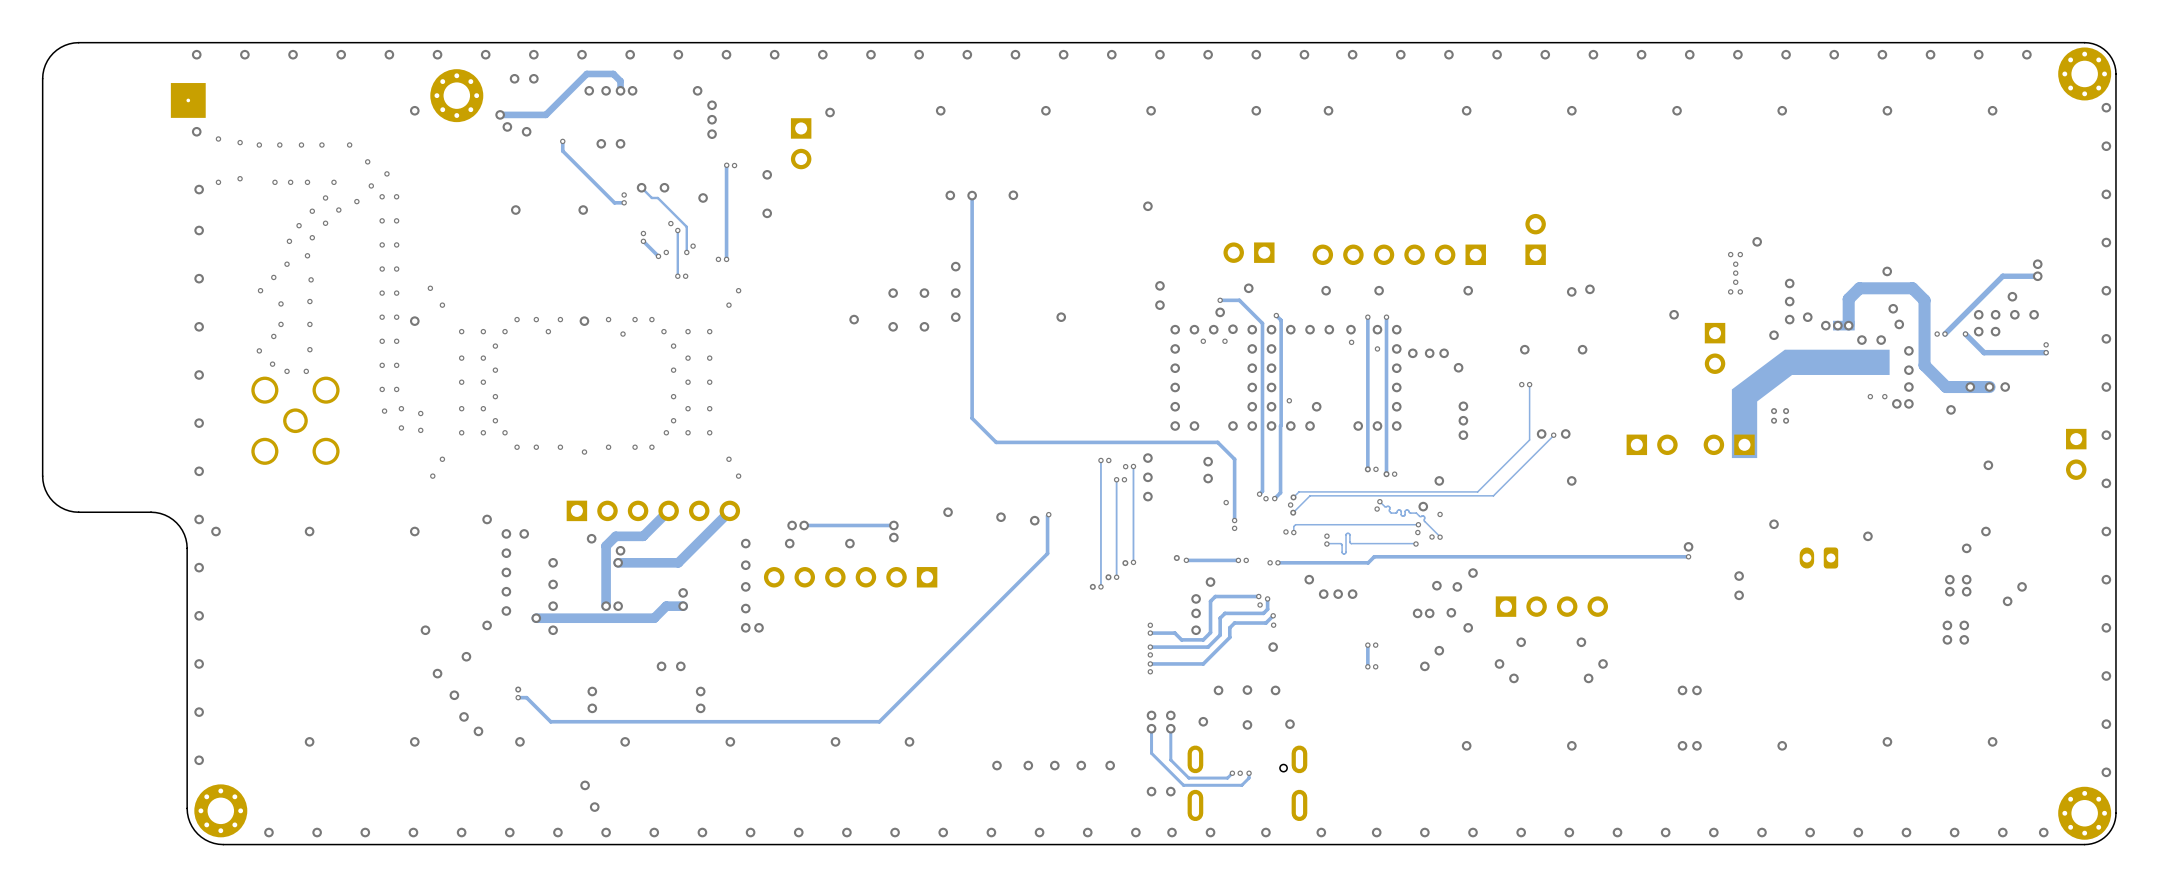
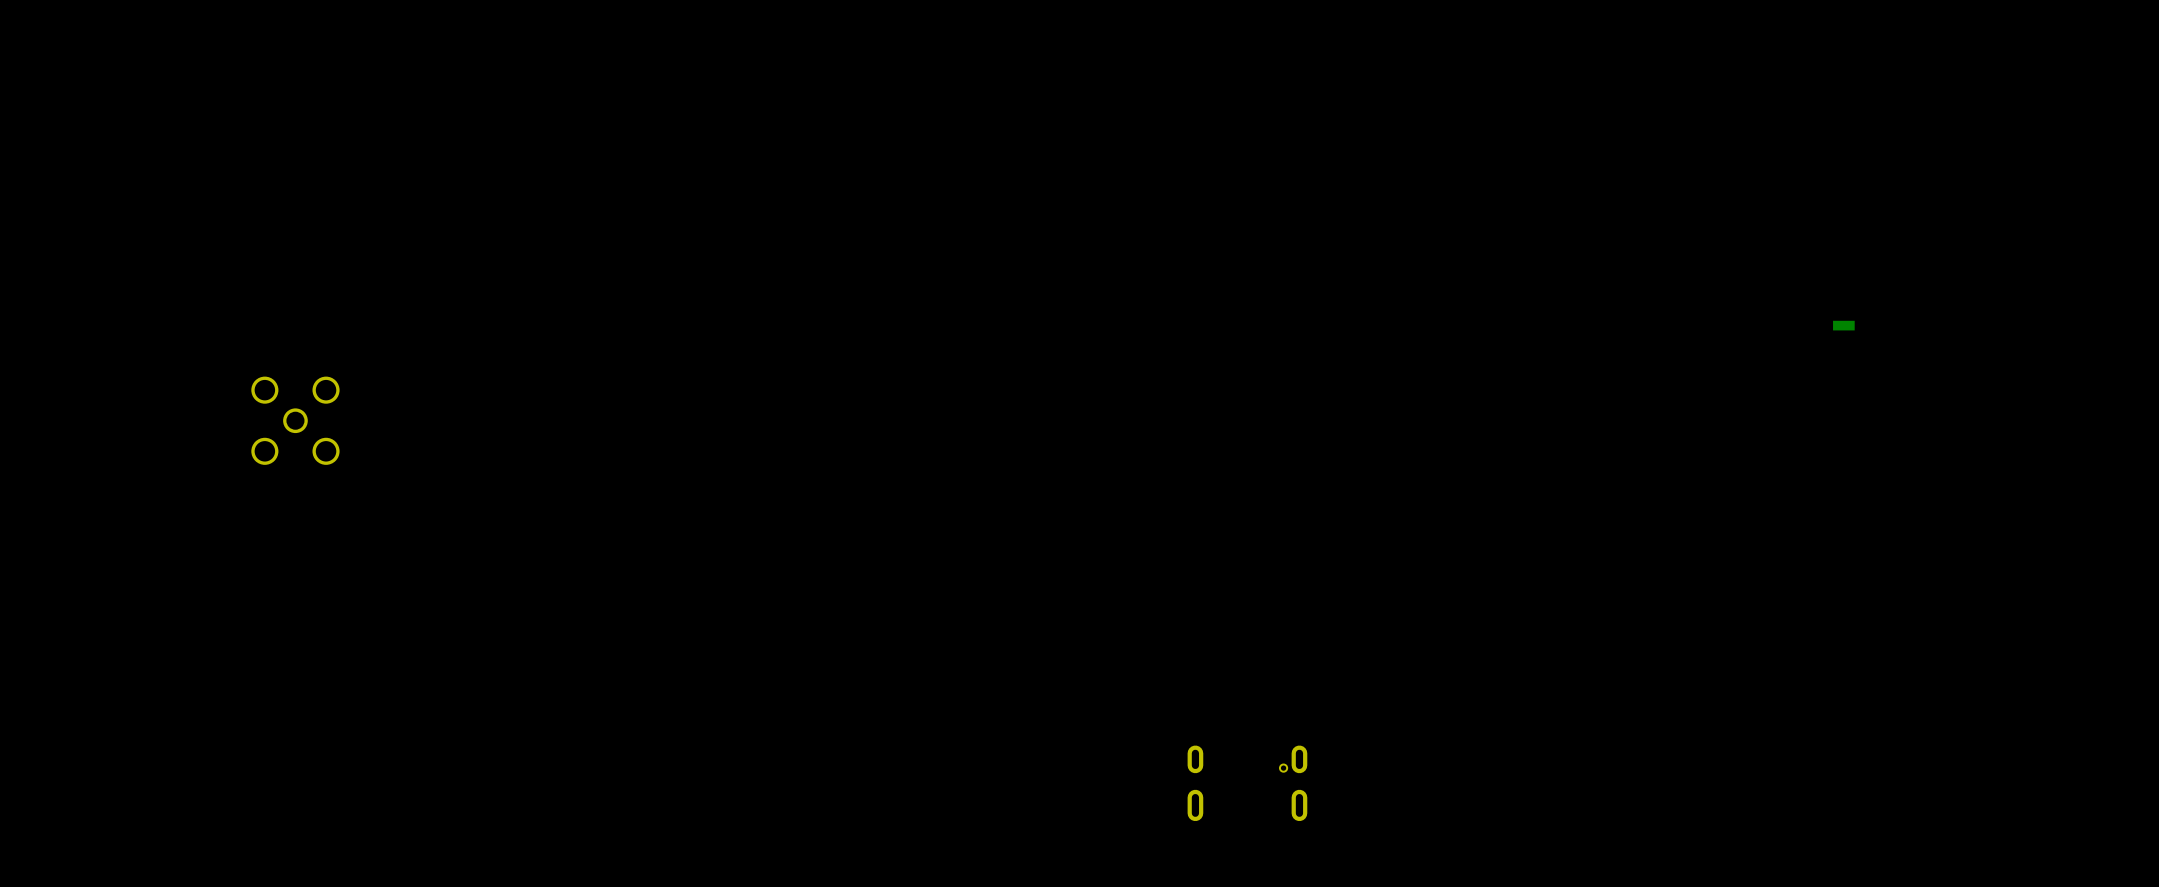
board edge: (2084, 42) (69, 43) (56, 50) (50, 56) (43, 69) (42, 78) (43, 485) (50, 498) (64, 509) (78, 512) (160, 513) (176, 522) (184, 534) (187, 548) (187, 813) (189, 822) (197, 833) (209, 841) (218, 844) (2091, 843) (2101, 839) (2109, 832) (2114, 823) (2115, 813) (2115, 73) (2113, 61) (2106, 51) (2096, 45) (2084, 42) -> none
via: (196, 54) -> none
via: (244, 54) -> none
via: (293, 54) -> none
via: (341, 54) -> none
via: (389, 54) -> none
via: (437, 54) -> none
via: (485, 54) -> none
via: (533, 54) -> none
via: (582, 54) -> none
via: (630, 54) -> none
via: (678, 54) -> none
via: (726, 54) -> none
via: (774, 54) -> none
via: (822, 54) -> none
via: (870, 54) -> none
via: (919, 54) -> none
via: (967, 54) -> none
via: (1015, 54) -> none
via: (1063, 54) -> none
via: (1111, 54) -> none
via: (1159, 54) -> none
via: (1208, 54) -> none
via: (1256, 54) -> none
via: (1304, 54) -> none
via: (1352, 54) -> none
via: (1400, 54) -> none
via: (1448, 54) -> none
via: (1497, 54) -> none
via: (1545, 54) -> none
via: (1593, 54) -> none
via: (1641, 54) -> none
via: (1689, 54) -> none
via: (1737, 54) -> none
via: (1786, 54) -> none
via: (1834, 54) -> none
via: (1882, 54) -> none
via: (1930, 54) -> none
via: (1978, 54) -> none
via: (2026, 54) -> none
part: (2084, 73) -> none
via: (514, 78) -> none
via: (533, 78) -> none
via: (589, 90) -> none
via: (606, 90) -> none
track: (620, 90) (620, 81) (613, 73) (586, 73) (545, 114) (500, 114) -> none
via: (620, 90) -> none
via: (632, 90) -> none
via: (697, 90) -> none
part: (456, 95) -> none
part: (188, 100) -> none
via: (712, 105) -> none
via: (2106, 107) -> none
via: (414, 110) -> none
via: (940, 110) -> none
via: (1045, 110) -> none
via: (1151, 110) -> none
via: (1256, 110) -> none
via: (1328, 110) -> none
via: (1466, 110) -> none
via: (1571, 110) -> none
via: (1677, 110) -> none
via: (1782, 110) -> none
via: (1887, 110) -> none
via: (1992, 110) -> none
via: (830, 112) -> none
via: (500, 114) -> none
via: (712, 119) -> none
via: (507, 126) -> none
via: (196, 131) -> none
via: (526, 131) -> none
via: (712, 134) -> none
via: (218, 138) -> none
track: (562, 141) (562, 151) (614, 202) (624, 202) -> none
via: (562, 141) -> none
via: (240, 142) -> none
via: (601, 143) -> none
via: (620, 143) -> none
part: (801, 143) -> none
via: (259, 145) -> none
via: (279, 145) -> none
via: (301, 145) -> none
via: (321, 145) -> none
via: (349, 145) -> none
via: (2106, 146) -> none
via: (367, 161) -> none
track: (726, 165) (726, 259) -> none
via: (726, 165) -> none
via: (734, 165) -> none
via: (386, 173) -> none
via: (767, 174) -> none
via: (240, 178) -> none
via: (218, 182) -> none
via: (274, 182) -> none
via: (290, 182) -> none
via: (307, 182) -> none
via: (333, 182) -> none
via: (371, 185) -> none
track: (641, 187) (651, 197) (657, 197) (686, 226) (686, 252) -> none
via: (641, 187) -> none
via: (664, 187) -> none
via: (199, 189) -> none
via: (624, 194) -> none
via: (2106, 194) -> none
via: (950, 195) -> none
track: (972, 195) (972, 418) (996, 442) (1217, 442) (1234, 459) (1234, 520) -> none
via: (972, 195) -> none
via: (1013, 195) -> none
via: (382, 196) -> none
via: (396, 196) -> none
via: (325, 197) -> none
via: (703, 197) -> none
via: (356, 201) -> none
via: (624, 202) -> none
via: (1147, 206) -> none
via: (338, 210) -> none
via: (515, 210) -> none
via: (583, 210) -> none
via: (312, 211) -> none
via: (767, 213) -> none
via: (382, 220) -> none
via: (396, 220) -> none
via: (325, 223) -> none
via: (670, 223) -> none
via: (299, 225) -> none
via: (199, 230) -> none
track: (677, 230) (677, 276) -> none
via: (677, 230) -> none
via: (643, 233) -> none
via: (312, 237) -> none
part: (1535, 239) -> none
via: (289, 241) -> none
track: (643, 241) (658, 256) -> none
via: (643, 241) -> none
via: (1757, 241) -> none
via: (2106, 242) -> none
via: (382, 244) -> none
via: (396, 244) -> none
via: (693, 246) -> none
via: (666, 252) -> none
via: (686, 252) -> none
part: (1249, 252) -> none
part: (1399, 254) -> none
via: (1730, 254) -> none
via: (1740, 254) -> none
via: (307, 255) -> none
via: (658, 256) -> none
via: (718, 259) -> none
via: (726, 259) -> none
via: (287, 264) -> none
via: (1735, 264) -> none
via: (2037, 264) -> none
via: (955, 266) -> none
via: (382, 269) -> none
via: (396, 269) -> none
via: (1887, 271) -> none
via: (1735, 273) -> none
via: (677, 276) -> none
via: (685, 276) -> none
track: (2037, 276) (2002, 276) (1945, 334) -> none
via: (2037, 276) -> none
via: (273, 277) -> none
via: (199, 278) -> none
via: (311, 279) -> none
via: (1735, 282) -> none
via: (1789, 283) -> none
via: (1159, 285) -> none
via: (430, 288) -> none
via: (1248, 288) -> none
via: (1589, 289) -> none
via: (260, 290) -> none
via: (738, 290) -> none
via: (1326, 290) -> none
via: (1379, 290) -> none
via: (1468, 290) -> none
via: (2106, 290) -> none
via: (1571, 291) -> none
via: (1730, 291) -> none
via: (1740, 291) -> none
via: (382, 293) -> none
via: (396, 293) -> none
via: (893, 293) -> none
via: (924, 293) -> none
via: (955, 293) -> none
via: (2012, 296) -> none
track: (1220, 300) (1239, 300) (1262, 323) (1262, 491) (1259, 494) -> none
via: (1220, 300) -> none
via: (309, 301) -> none
via: (1789, 301) -> none
via: (281, 303) -> none
via: (442, 305) -> none
via: (728, 305) -> none
via: (1159, 305) -> none
via: (1893, 308) -> none
via: (1220, 312) -> none
via: (1674, 314) -> none
via: (1978, 314) -> none
via: (1995, 314) -> none
via: (2014, 314) -> none
via: (2034, 314) -> none
track: (1276, 315) (1281, 320) (1281, 425) (1280, 492) (1274, 498) -> none
via: (1276, 315) -> none
via: (382, 317) -> none
via: (396, 317) -> none
via: (955, 317) -> none
via: (1061, 317) -> none
track: (1367, 317) (1367, 469) -> none
via: (1367, 317) -> none
track: (1386, 317) (1386, 474) -> none
via: (1386, 317) -> none
via: (1807, 317) -> none
via: (517, 319) -> none
via: (536, 319) -> none
via: (560, 319) -> none
via: (608, 319) -> none
via: (635, 319) -> none
via: (651, 319) -> none
via: (854, 319) -> none
via: (1789, 319) -> none
via: (414, 321) -> none
via: (584, 321) -> none
via: (281, 324) -> none
via: (309, 324) -> none
track: (1848, 324) (1848, 299) (1859, 288) (1912, 288) (1924, 300) (1924, 365) (1946, 387) (1989, 387) -> none
via: (1899, 324) -> none
via: (1825, 325) -> none
via: (1837, 325) -> none
via: (1848, 325) -> none
via: (199, 326) -> none
via: (893, 326) -> none
via: (924, 326) -> none
via: (1175, 329) -> none
via: (1194, 329) -> none
via: (1213, 329) -> none
via: (1232, 329) -> none
via: (1252, 329) -> none
via: (1271, 329) -> none
via: (1290, 329) -> none
via: (1310, 329) -> none
via: (1329, 329) -> none
via: (1350, 329) -> none
via: (1377, 329) -> none
via: (1396, 329) -> none
via: (461, 331) -> none
via: (483, 331) -> none
via: (505, 331) -> none
via: (548, 331) -> none
via: (663, 331) -> none
via: (688, 331) -> none
via: (709, 331) -> none
via: (1978, 331) -> none
via: (1995, 331) -> none
via: (623, 334) -> none
via: (1937, 334) -> none
via: (1945, 334) -> none
track: (1965, 334) (1984, 352) (2046, 352) -> none
via: (1965, 334) -> none
via: (1774, 335) -> none
via: (273, 336) -> none
via: (2106, 338) -> none
via: (1861, 340) -> none
via: (1881, 340) -> none
via: (382, 341) -> none
via: (396, 341) -> none
via: (1203, 341) -> none
via: (1224, 341) -> none
via: (1351, 342) -> none
via: (2046, 344) -> none
via: (495, 346) -> none
via: (673, 346) -> none
via: (1175, 348) -> none
via: (1252, 348) -> none
via: (1271, 348) -> none
via: (1377, 348) -> none
via: (1396, 348) -> none
part: (1715, 348) -> none
via: (309, 349) -> none
via: (1524, 349) -> none
via: (1582, 349) -> none
drawing: [1731, 349, 1890, 459] -> none
via: (259, 350) -> none
via: (1908, 350) -> none
via: (2046, 352) -> none
via: (1412, 353) -> none
via: (1429, 353) -> none
via: (1444, 353) -> none
via: (461, 358) -> none
via: (483, 358) -> none
via: (688, 358) -> none
via: (709, 358) -> none
via: (272, 364) -> none
via: (382, 365) -> none
via: (396, 365) -> none
via: (1458, 367) -> none
via: (1175, 368) -> none
via: (1252, 368) -> none
via: (1271, 368) -> none
via: (1396, 368) -> none
via: (495, 370) -> none
via: (673, 370) -> none
via: (1908, 370) -> none
via: (287, 371) -> none
via: (306, 371) -> none
via: (199, 374) -> none
via: (461, 382) -> none
via: (483, 382) -> none
via: (688, 382) -> none
via: (709, 382) -> none
via: (1521, 384) -> none
track: (1529, 384) (1529, 440) (1477, 491) (1298, 491) (1293, 497) -> none
via: (1529, 384) -> none
via: (1175, 387) -> none
via: (1252, 387) -> none
via: (1271, 387) -> none
via: (1396, 387) -> none
via: (1908, 387) -> none
via: (1970, 387) -> none
via: (1989, 387) -> none
via: (2005, 387) -> none
via: (2106, 387) -> none
via: (382, 389) -> none
via: (396, 389) -> none
via: (495, 396) -> none
via: (673, 396) -> none
via: (1870, 396) -> none
via: (1884, 396) -> none
via: (1289, 400) -> none
via: (1896, 403) -> none
via: (1908, 403) -> none
via: (1175, 406) -> none
via: (1252, 406) -> none
via: (1271, 406) -> none
via: (1316, 406) -> none
via: (1396, 406) -> none
via: (1463, 406) -> none
via: (401, 408) -> none
via: (461, 408) -> none
via: (483, 408) -> none
via: (688, 408) -> none
via: (709, 408) -> none
via: (1951, 409) -> none
via: (384, 411) -> none
via: (1774, 411) -> none
via: (1786, 411) -> none
via: (420, 413) -> none
via: (495, 420) -> none
via: (673, 420) -> none
via: (1463, 420) -> none
via: (1774, 420) -> none
via: (1786, 420) -> none
via: (199, 423) -> none
via: (1175, 426) -> none
via: (1194, 426) -> none
via: (1232, 426) -> none
via: (1252, 426) -> none
via: (1271, 426) -> none
via: (1290, 426) -> none
via: (1310, 426) -> none
via: (1358, 426) -> none
via: (1377, 426) -> none
via: (1396, 426) -> none
via: (401, 427) -> none
via: (420, 430) -> none
via: (461, 432) -> none
via: (483, 432) -> none
via: (505, 432) -> none
via: (666, 432) -> none
via: (688, 432) -> none
via: (709, 432) -> none
via: (1541, 433) -> none
via: (1565, 433) -> none
via: (1463, 435) -> none
track: (1553, 435) (1493, 495) (1310, 495) (1293, 512) -> none
via: (1553, 435) -> none
via: (2106, 435) -> none
part: (1652, 444) -> none
part: (1729, 444) -> none
via: (517, 447) -> none
via: (536, 447) -> none
via: (560, 447) -> none
via: (608, 447) -> none
via: (635, 447) -> none
via: (651, 447) -> none
via: (584, 452) -> none
part: (2076, 454) -> none
via: (1147, 458) -> none
via: (442, 459) -> none
via: (728, 459) -> none
track: (1100, 460) (1100, 586) -> none
via: (1100, 460) -> none
via: (1108, 460) -> none
via: (1208, 461) -> none
via: (1988, 465) -> none
via: (1125, 466) -> none
track: (1133, 466) (1133, 562) -> none
via: (1133, 466) -> none
via: (1367, 469) -> none
via: (1375, 469) -> none
via: (199, 471) -> none
via: (1386, 474) -> none
via: (1394, 474) -> none
via: (432, 476) -> none
via: (738, 476) -> none
via: (1147, 477) -> none
via: (1208, 478) -> none
track: (1116, 479) (1116, 577) -> none
via: (1116, 479) -> none
via: (1124, 479) -> none
via: (1439, 480) -> none
via: (1571, 480) -> none
via: (2106, 483) -> none
via: (1259, 494) -> none
via: (1147, 496) -> none
via: (1293, 497) -> none
via: (1265, 498) -> none
via: (1274, 498) -> none
track: (1379, 501) (1385, 506) (1389, 506) (1391, 513) (1396, 513) (1400, 510) (1401, 515) (1403, 516) (1405, 510) (1407, 510) (1409, 512) (1423, 516) (1424, 521) (1440, 537) -> none
via: (1379, 501) -> none
via: (1226, 502) -> none
via: (1290, 504) -> none
via: (1423, 506) -> none
via: (1377, 509) -> none
part: (653, 510) -> none
track: (668, 510) (643, 536) (615, 536) (606, 545) (606, 606) -> none
track: (729, 511) (678, 562) (618, 562) -> none
via: (948, 512) -> none
via: (1293, 512) -> none
track: (1048, 514) (1047, 553) (879, 721) (550, 721) (526, 697) (518, 697) -> none
via: (1048, 514) -> none
via: (1440, 514) -> none
via: (1001, 517) -> none
via: (199, 519) -> none
via: (487, 519) -> none
via: (1034, 520) -> none
via: (1234, 520) -> none
track: (1418, 524) (1295, 524) (1293, 532) -> none
via: (1418, 524) -> none
via: (1774, 524) -> none
via: (792, 525) -> none
via: (804, 525) -> none
track: (893, 525) (804, 525) -> none
via: (893, 525) -> none
via: (1234, 528) -> none
via: (215, 531) -> none
via: (309, 531) -> none
via: (414, 531) -> none
via: (1285, 531) -> none
via: (1985, 531) -> none
via: (2106, 531) -> none
via: (1293, 532) -> none
via: (1417, 532) -> none
via: (506, 533) -> none
via: (524, 533) -> none
via: (1326, 536) -> none
via: (1867, 536) -> none
via: (893, 537) -> none
via: (1432, 537) -> none
via: (1440, 537) -> none
via: (591, 538) -> none
via: (745, 543) -> none
via: (789, 543) -> none
via: (849, 543) -> none
via: (1326, 544) -> none
track: (1416, 544) (1351, 543) (1348, 533) (1346, 534) (1345, 553) (1342, 552) (1341, 543) (1326, 544) -> none
via: (1416, 544) -> none
via: (1688, 546) -> none
via: (1966, 548) -> none
via: (620, 550) -> none
via: (506, 553) -> none
track: (1688, 556) (1374, 556) (1368, 562) (1277, 562) -> none
via: (1688, 556) -> none
via: (1176, 558) -> none
part: (1818, 558) -> none
via: (1186, 560) -> none
track: (1238, 560) (1186, 560) -> none
via: (1238, 560) -> none
via: (1246, 560) -> none
via: (553, 562) -> none
via: (618, 562) -> none
via: (1133, 562) -> none
via: (1270, 562) -> none
via: (1277, 562) -> none
via: (1125, 563) -> none
via: (745, 565) -> none
via: (199, 567) -> none
via: (506, 572) -> none
via: (1473, 573) -> none
via: (1739, 576) -> none
part: (850, 577) -> none
via: (1108, 577) -> none
via: (1116, 577) -> none
via: (1309, 579) -> none
via: (1949, 579) -> none
via: (1966, 579) -> none
via: (2106, 579) -> none
via: (1210, 582) -> none
via: (553, 584) -> none
via: (1436, 585) -> none
via: (745, 586) -> none
via: (1092, 586) -> none
via: (1100, 586) -> none
via: (1457, 586) -> none
via: (2022, 586) -> none
via: (506, 591) -> none
via: (1949, 591) -> none
via: (1966, 591) -> none
via: (683, 592) -> none
via: (1323, 594) -> none
via: (1338, 594) -> none
via: (1352, 594) -> none
via: (1739, 595) -> none
track: (1258, 596) (1215, 596) (1210, 601) (1210, 632) (1203, 639) (1181, 639) (1174, 633) (1150, 633) -> none
via: (1258, 596) -> none
via: (1196, 598) -> none
track: (1267, 598) (1267, 609) (1263, 613) (1224, 613) (1220, 618) (1220, 635) (1208, 647) (1150, 647) -> none
via: (1267, 598) -> none
via: (2007, 601) -> none
via: (1260, 604) -> none
via: (553, 606) -> none
via: (606, 606) -> none
via: (618, 606) -> none
track: (683, 606) (666, 606) (654, 618) (536, 618) -> none
via: (683, 606) -> none
part: (1551, 606) -> none
via: (745, 608) -> none
via: (506, 610) -> none
via: (1451, 612) -> none
via: (1196, 613) -> none
via: (1417, 613) -> none
via: (1429, 613) -> none
via: (199, 615) -> none
track: (1273, 615) (1265, 623) (1234, 623) (1229, 627) (1229, 637) (1203, 663) (1150, 663) -> none
via: (1273, 615) -> none
via: (536, 618) -> none
via: (487, 625) -> none
via: (1150, 625) -> none
via: (1273, 625) -> none
via: (1947, 625) -> none
via: (1964, 625) -> none
via: (745, 627) -> none
via: (759, 627) -> none
via: (1468, 627) -> none
via: (2106, 627) -> none
via: (425, 630) -> none
via: (553, 630) -> none
via: (1196, 630) -> none
via: (1150, 633) -> none
via: (1947, 639) -> none
via: (1964, 639) -> none
via: (1521, 642) -> none
via: (1581, 642) -> none
track: (1367, 645) (1367, 666) -> none
via: (1367, 645) -> none
via: (1375, 645) -> none
via: (1150, 647) -> none
via: (1273, 647) -> none
via: (1439, 650) -> none
via: (1150, 654) -> none
via: (466, 656) -> none
via: (199, 663) -> none
via: (1150, 663) -> none
via: (1499, 663) -> none
via: (1603, 663) -> none
via: (661, 666) -> none
via: (680, 666) -> none
via: (1367, 666) -> none
via: (1375, 666) -> none
via: (1424, 666) -> none
via: (1150, 671) -> none
via: (437, 673) -> none
via: (2106, 675) -> none
via: (1513, 678) -> none
via: (1588, 678) -> none
via: (518, 689) -> none
via: (1218, 690) -> none
via: (1247, 690) -> none
via: (1275, 690) -> none
via: (1682, 690) -> none
via: (1696, 690) -> none
via: (592, 691) -> none
via: (700, 691) -> none
via: (454, 695) -> none
via: (518, 697) -> none
via: (592, 708) -> none
via: (700, 708) -> none
via: (199, 712) -> none
via: (1151, 715) -> none
via: (1170, 715) -> none
via: (464, 716) -> none
via: (1203, 721) -> none
via: (1247, 724) -> none
via: (1290, 724) -> none
via: (2106, 724) -> none
track: (1151, 728) (1151, 753) (1183, 785) (1241, 785) (1249, 778) (1249, 773) -> none
via: (1151, 728) -> none
track: (1170, 728) (1170, 760) (1188, 778) (1227, 778) (1232, 773) -> none
via: (1170, 728) -> none
via: (478, 731) -> none
via: (309, 741) -> none
via: (414, 741) -> none
via: (519, 741) -> none
via: (625, 741) -> none
via: (730, 741) -> none
via: (835, 741) -> none
via: (909, 741) -> none
via: (1887, 741) -> none
via: (1992, 741) -> none
via: (1466, 745) -> none
via: (1571, 745) -> none
via: (1682, 745) -> none
via: (1696, 745) -> none
via: (1782, 745) -> none
via: (199, 760) -> none
via: (996, 765) -> none
via: (1028, 765) -> none
via: (1054, 765) -> none
via: (1081, 765) -> none
via: (1110, 765) -> none
via: (2106, 772) -> none
via: (1232, 773) -> none
via: (1240, 773) -> none
via: (1249, 773) -> none
via: (585, 785) -> none
via: (1151, 791) -> none
via: (1170, 791) -> none
via: (594, 807) -> none
part: (220, 810) -> none
part: (2084, 813) -> none
via: (268, 832) -> none
via: (317, 832) -> none
via: (365, 832) -> none
via: (413, 832) -> none
via: (461, 832) -> none
via: (509, 832) -> none
via: (557, 832) -> none
via: (606, 832) -> none
via: (654, 832) -> none
via: (702, 832) -> none
via: (750, 832) -> none
via: (798, 832) -> none
via: (846, 832) -> none
via: (895, 832) -> none
via: (943, 832) -> none
via: (991, 832) -> none
via: (1039, 832) -> none
via: (1087, 832) -> none
via: (1135, 832) -> none
via: (1172, 832) -> none
via: (1210, 832) -> none
via: (1265, 832) -> none
via: (1321, 832) -> none
via: (1376, 832) -> none
via: (1424, 832) -> none
via: (1473, 832) -> none
via: (1521, 832) -> none
via: (1569, 832) -> none
via: (1617, 832) -> none
via: (1665, 832) -> none
via: (1713, 832) -> none
via: (1761, 832) -> none
via: (1810, 832) -> none
via: (1858, 832) -> none
via: (1906, 832) -> none
via: (1954, 832) -> none
via: (2002, 832) -> none
via: (2043, 832) -> none

